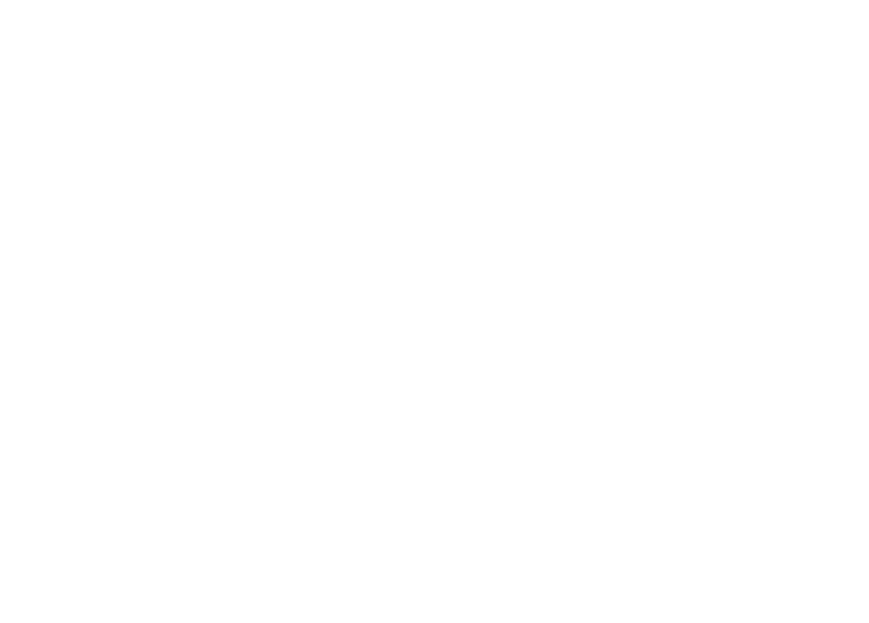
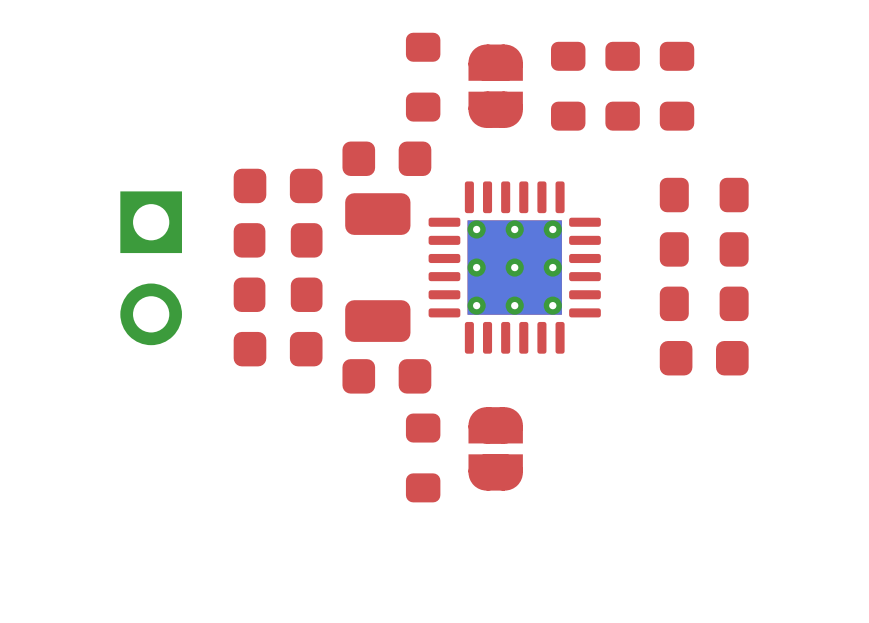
part: none -> (423, 77)
part: none -> (495, 86)
part: none -> (568, 86)
part: none -> (622, 86)
part: none -> (677, 86)
part: none -> (386, 158)
part: none -> (278, 185)
part: none -> (704, 195)
part: none -> (278, 240)
part: none -> (704, 249)
part: none -> (377, 267)
part: none -> (514, 267)
part: none -> (151, 268)
part: none -> (278, 294)
part: none -> (704, 303)
part: none -> (278, 349)
part: none -> (704, 358)
part: none -> (386, 376)
part: none -> (495, 448)
part: none -> (423, 457)

